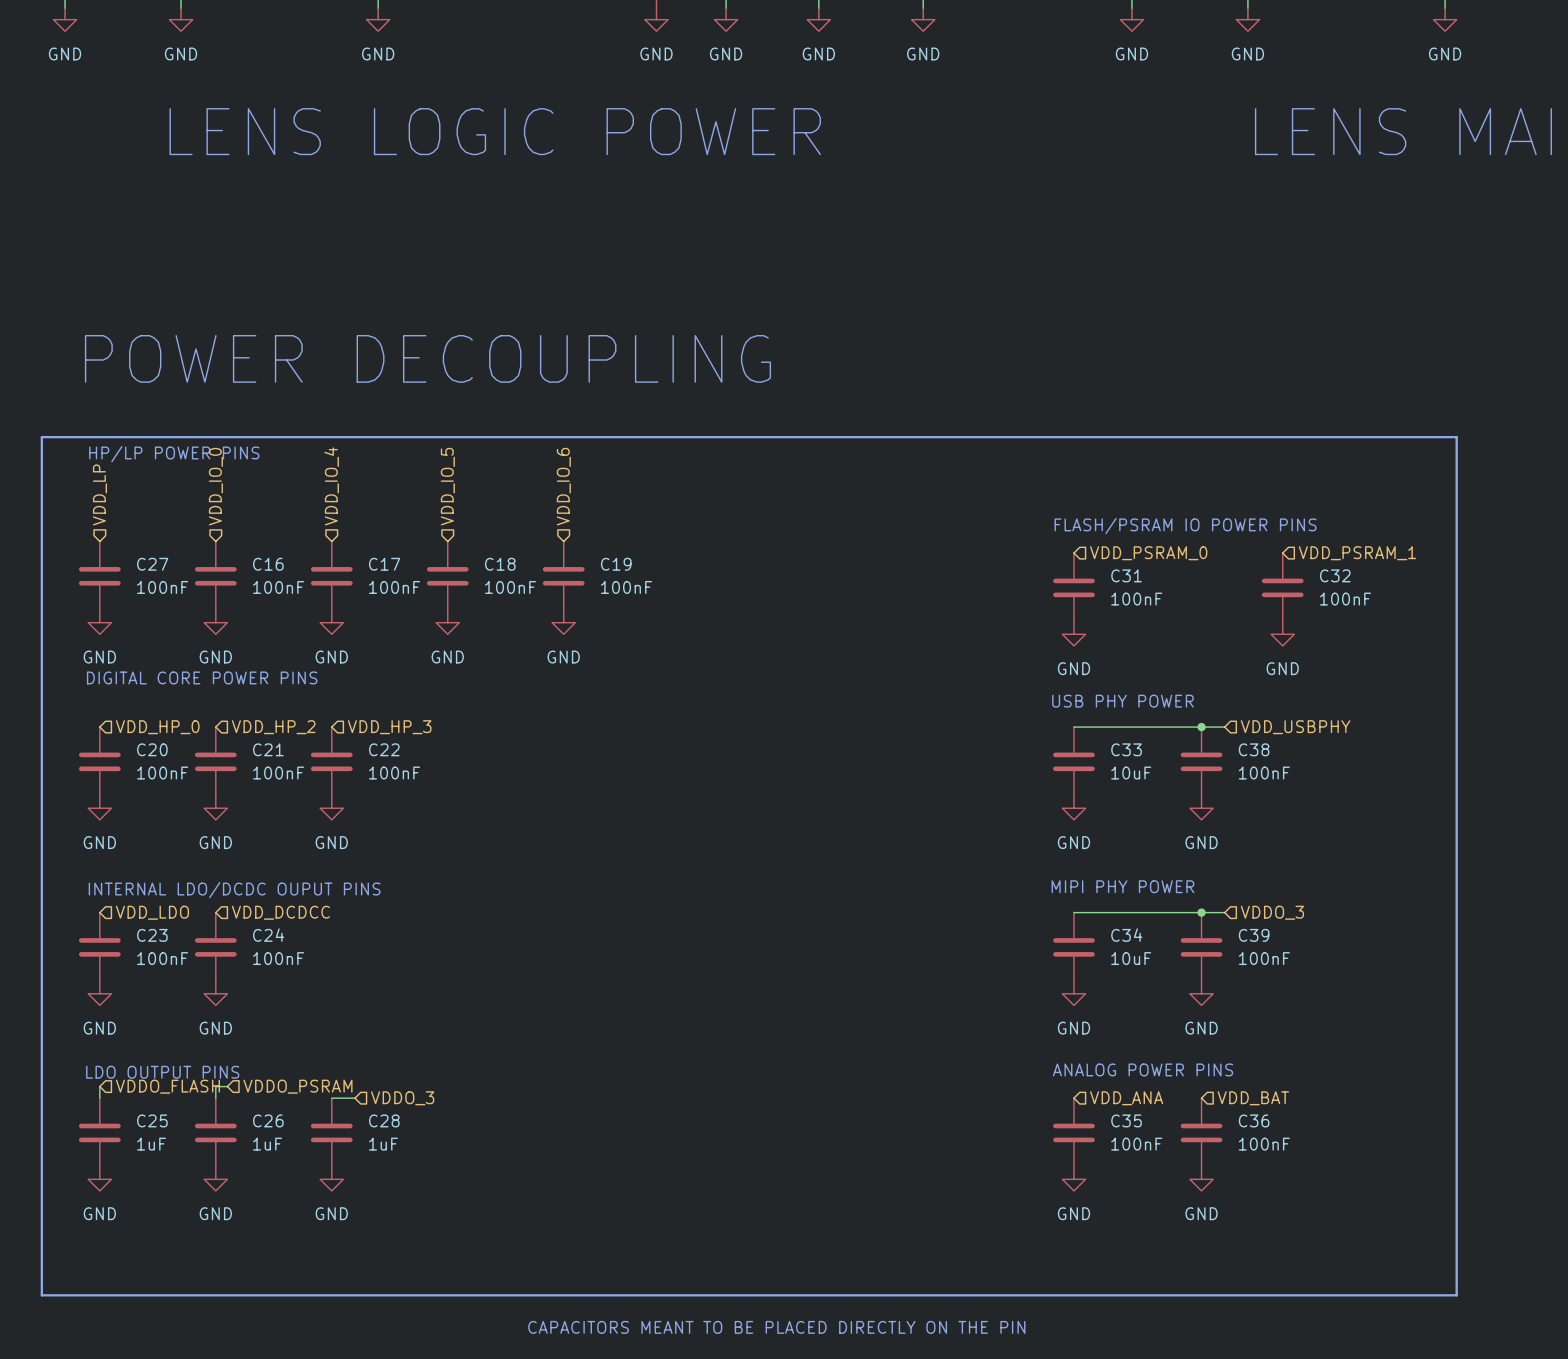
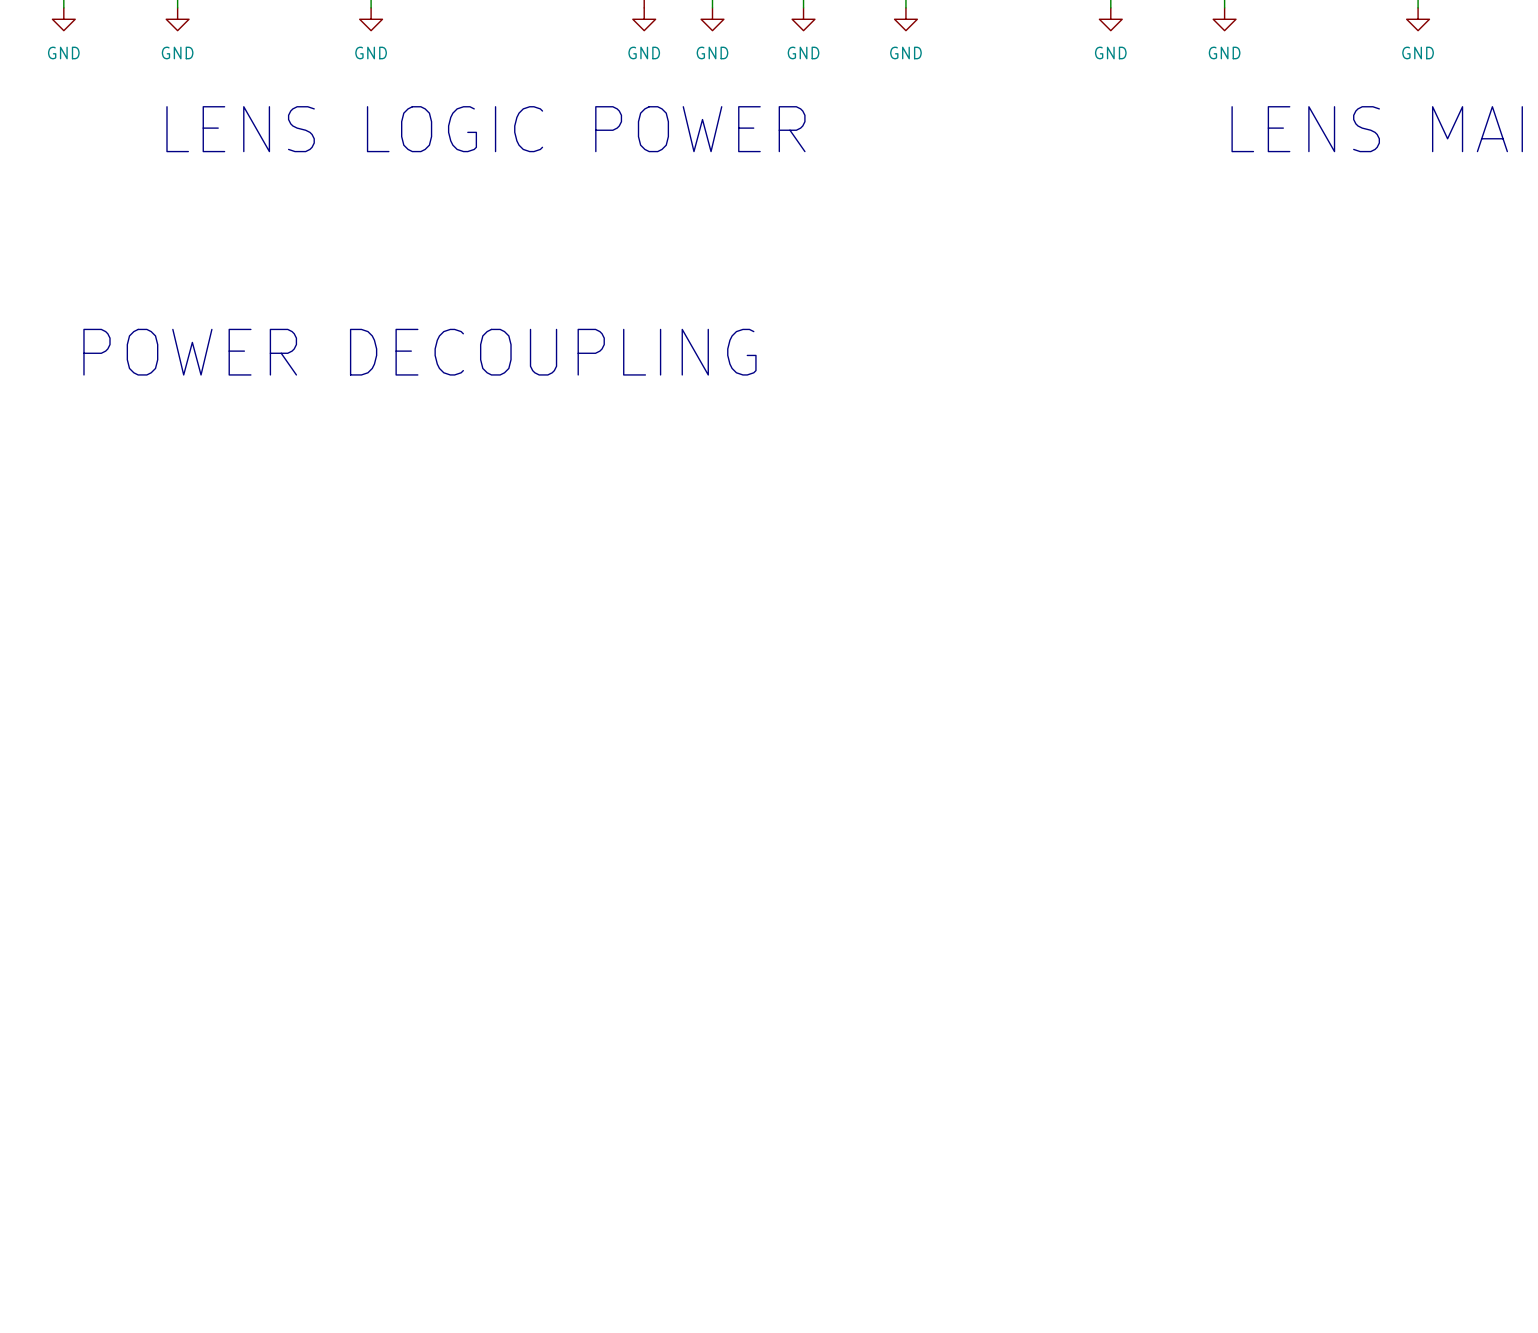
line: (41, 437) (1456, 437) (1456, 1295) (41, 1295) (41, 437) -> none
text: HP/LP POWER PINS (174, 454) -> none
hierarchical label: VDD_IO_0 (215, 486) -> none
hierarchical label: VDD_IO_4 (331, 486) -> none
hierarchical label: VDD_IO_5 (447, 486) -> none
hierarchical label: VDD_IO_6 (563, 486) -> none
hierarchical label: VDD_LP (99, 494) -> none
text: FLASH/PSRAM IO POWER PINS (1185, 525) -> none
hierarchical label: VDD_PSRAM_0 (1148, 553) -> none
hierarchical label: VDD_PSRAM_1 (1357, 553) -> none
C27: 100nF (99, 576) -> none
C16: 100nF (215, 576) -> none
C17: 100nF (331, 576) -> none
C18: 100nF (447, 576) -> none
C19: 100nF (563, 576) -> none
C31: 100nF (1073, 587) -> none
C32: 100nF (1282, 587) -> none
power symbol: GND (99, 622) -> none
power symbol: GND (215, 622) -> none
power symbol: GND (331, 622) -> none
power symbol: GND (447, 622) -> none
power symbol: GND (563, 622) -> none
power symbol: GND (1073, 634) -> none
power symbol: GND (1282, 634) -> none
text: DIGITAL CORE POWER PINS (202, 677) -> none
text: USB PHY POWER (1122, 701) -> none
hierarchical label: VDD_HP_0 (157, 727) -> none
hierarchical label: VDD_HP_2 (273, 727) -> none
hierarchical label: VDD_HP_3 (389, 727) -> none
wire: (1073, 727) (1224, 727) -> none
junction: (1201, 727) -> none
hierarchical label: VDD_USBPHY (1295, 727) -> none
C20: 100nF (99, 761) -> none
C21: 100nF (215, 761) -> none
C22: 100nF (331, 761) -> none
C33: 10uF (1073, 761) -> none
C38: 100nF (1201, 761) -> none
power symbol: GND (99, 808) -> none
power symbol: GND (215, 808) -> none
power symbol: GND (331, 808) -> none
power symbol: GND (1073, 808) -> none
power symbol: GND (1201, 808) -> none
text: MIPI PHY POWER (1122, 886) -> none
text: INTERNAL LDO/DCDC OUPUT PINS (234, 890) -> none
hierarchical label: VDD_LDO (152, 912) -> none
hierarchical label: VDD_DCDCC (280, 912) -> none
wire: (1073, 912) (1224, 912) -> none
junction: (1201, 912) -> none
hierarchical label: VDDO_3 (1272, 912) -> none
C23: 100nF (99, 947) -> none
C24: 100nF (215, 947) -> none
C34: 10uF (1073, 947) -> none
C39: 100nF (1201, 947) -> none
power symbol: GND (99, 993) -> none
power symbol: GND (215, 993) -> none
power symbol: GND (1073, 993) -> none
power symbol: GND (1201, 993) -> none
text: ANALOG POWER PINS (1143, 1069) -> none
text: LDO OUTPUT PINS (162, 1072) -> none
wire: (99, 1086) (99, 1098) -> none
hierarchical label: VDDO_FLASH (167, 1086) -> none
wire: (227, 1086) (215, 1086) (215, 1098) -> none
hierarchical label: VDDO_PSRAM (297, 1086) -> none
wire: (331, 1098) (354, 1098) -> none
hierarchical label: VDDO_3 (402, 1098) -> none
hierarchical label: VDD_ANA (1126, 1098) -> none
hierarchical label: VDD_BAT (1253, 1098) -> none
C25: 1uF (99, 1132) -> none
C26: 1uF (215, 1132) -> none
C28: 1uF (331, 1132) -> none
C35: 100nF (1073, 1132) -> none
C36: 100nF (1201, 1132) -> none
power symbol: GND (99, 1179) -> none
power symbol: GND (215, 1179) -> none
power symbol: GND (331, 1179) -> none
power symbol: GND (1073, 1179) -> none
power symbol: GND (1201, 1179) -> none
text: CAPACITORS MEANT TO BE PLACED DIRECTLY ON THE PIN (776, 1327) -> none

